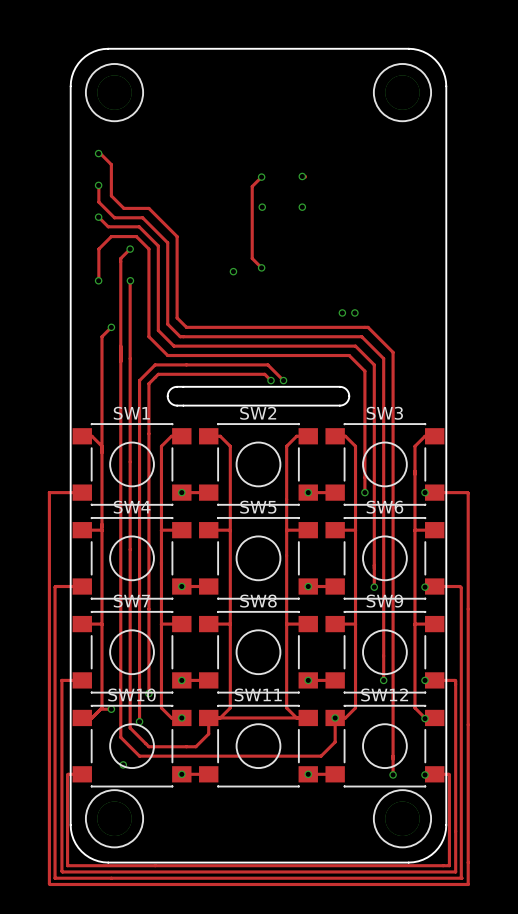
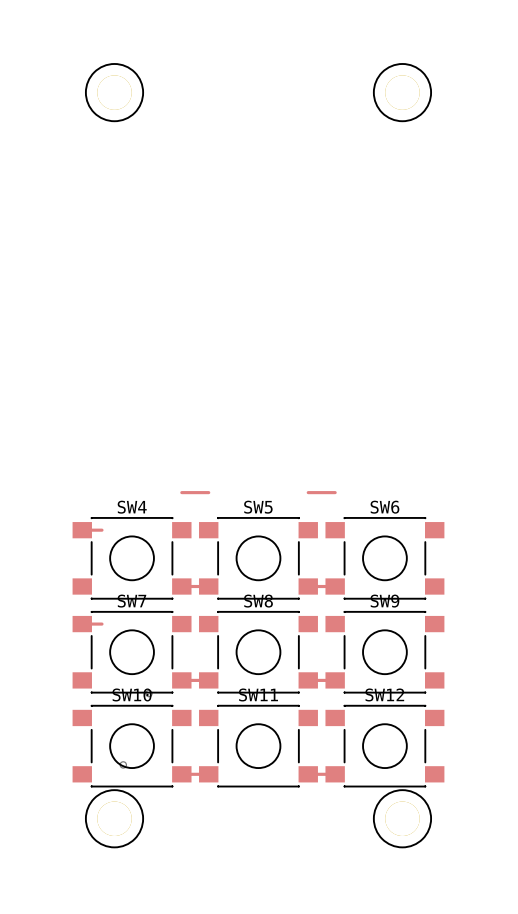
board edge: (108, 48) (413, 49) (431, 56) (443, 71) (446, 86) (446, 825) (443, 839) (438, 847) (423, 859) (408, 862) (108, 862) (93, 859) (85, 854) (73, 839) (70, 825) (70, 86) (73, 71) (81, 59) (93, 51) (108, 48) -> none
track: (98, 153) (111, 164) (111, 195) (123, 208) (148, 208) (177, 236) (177, 317) (186, 327) (368, 327) (393, 352) (393, 774) -> none
via: (98, 153) -> none
via: (302, 176) -> none
track: (305, 176) (305, 177) -> none
track: (261, 177) (252, 186) (252, 258) (261, 267) -> none
via: (261, 177) -> none
track: (98, 185) (98, 202) (114, 217) (142, 217) (167, 242) (167, 324) (180, 336) (361, 336) (383, 358) (383, 680) -> none
via: (98, 185) -> none
via: (262, 207) -> none
via: (302, 207) -> none
track: (98, 217) (108, 226) (139, 226) (158, 245) (158, 330) (173, 346) (355, 346) (374, 364) (374, 587) -> none
via: (98, 217) -> none
track: (130, 249) (120, 258) (120, 737) (139, 756) (321, 756) (335, 742) (335, 717) (345, 717) (355, 707) (355, 446) (345, 436) (334, 436) -> none
via: (130, 249) -> none
via: (261, 267) -> none
via: (233, 271) -> none
track: (98, 280) (98, 249) (111, 236) (136, 236) (148, 249) (148, 336) (167, 355) (349, 355) (364, 371) (364, 492) -> none
via: (98, 280) -> none
track: (130, 280) (130, 727) (148, 746) (195, 746) (208, 733) (208, 717) (308, 717) -> none
via: (130, 280) -> none
via: (342, 312) -> none
via: (354, 312) -> none
track: (111, 327) (101, 336) (101, 707) (91, 717) (82, 717) -> none
via: (111, 327) -> none
track: (271, 380) (264, 374) (158, 374) (148, 383) (148, 693) -> none
via: (271, 380) -> none
track: (283, 380) (267, 364) (155, 364) (139, 380) (139, 721) -> none
via: (283, 380) -> none
board edge: (177, 386) (339, 386) (346, 389) (349, 396) (346, 402) (339, 405) (177, 405) (170, 402) (167, 396) (170, 389) (177, 386) -> none
track: (82, 436) (91, 436) (101, 446) -> none
track: (181, 436) (171, 436) (161, 446) (161, 707) (171, 717) (181, 717) -> none
track: (208, 436) (220, 436) (230, 446) (230, 707) (220, 717) -> none
track: (308, 436) (296, 436) (286, 446) (286, 707) (296, 717) -> none
track: (434, 436) (425, 436) (414, 446) (414, 707) (425, 717) -> none
SW1: (132, 464) -> none
SW2: (258, 464) -> none
SW3: (384, 464) -> none
track: (82, 492) (49, 492) (49, 883) (468, 884) (468, 493) (434, 492) -> none
via: (181, 492) -> none
via: (308, 492) -> none
via: (364, 492) -> none
via: (425, 492) -> none
track: (161, 530) (181, 530) -> none
track: (208, 530) (230, 530) -> none
track: (286, 530) (308, 530) -> none
track: (335, 530) (355, 530) -> none
track: (414, 530) (434, 530) -> none
track: (82, 586) (55, 587) (55, 878) (461, 878) (461, 587) (425, 587) -> none
via: (181, 586) -> none
via: (308, 586) -> none
via: (374, 587) -> none
via: (425, 587) -> none
track: (161, 624) (181, 624) -> none
track: (208, 624) (230, 624) -> none
track: (286, 624) (308, 624) -> none
track: (335, 624) (355, 624) -> none
track: (414, 624) (434, 624) -> none
track: (82, 680) (61, 680) (62, 871) (455, 871) (455, 681) (434, 680) -> none
via: (181, 680) -> none
via: (308, 680) -> none
via: (383, 680) -> none
via: (425, 680) -> none
track: (100, 709) (111, 709) -> none
via: (111, 709) -> none
via: (181, 717) -> none
via: (335, 717) -> none
via: (425, 718) -> none
via: (139, 721) -> none
track: (82, 774) (67, 774) (67, 865) (449, 865) (449, 774) (425, 774) -> none
via: (181, 774) -> none
via: (308, 774) -> none
via: (393, 774) -> none
via: (425, 774) -> none

